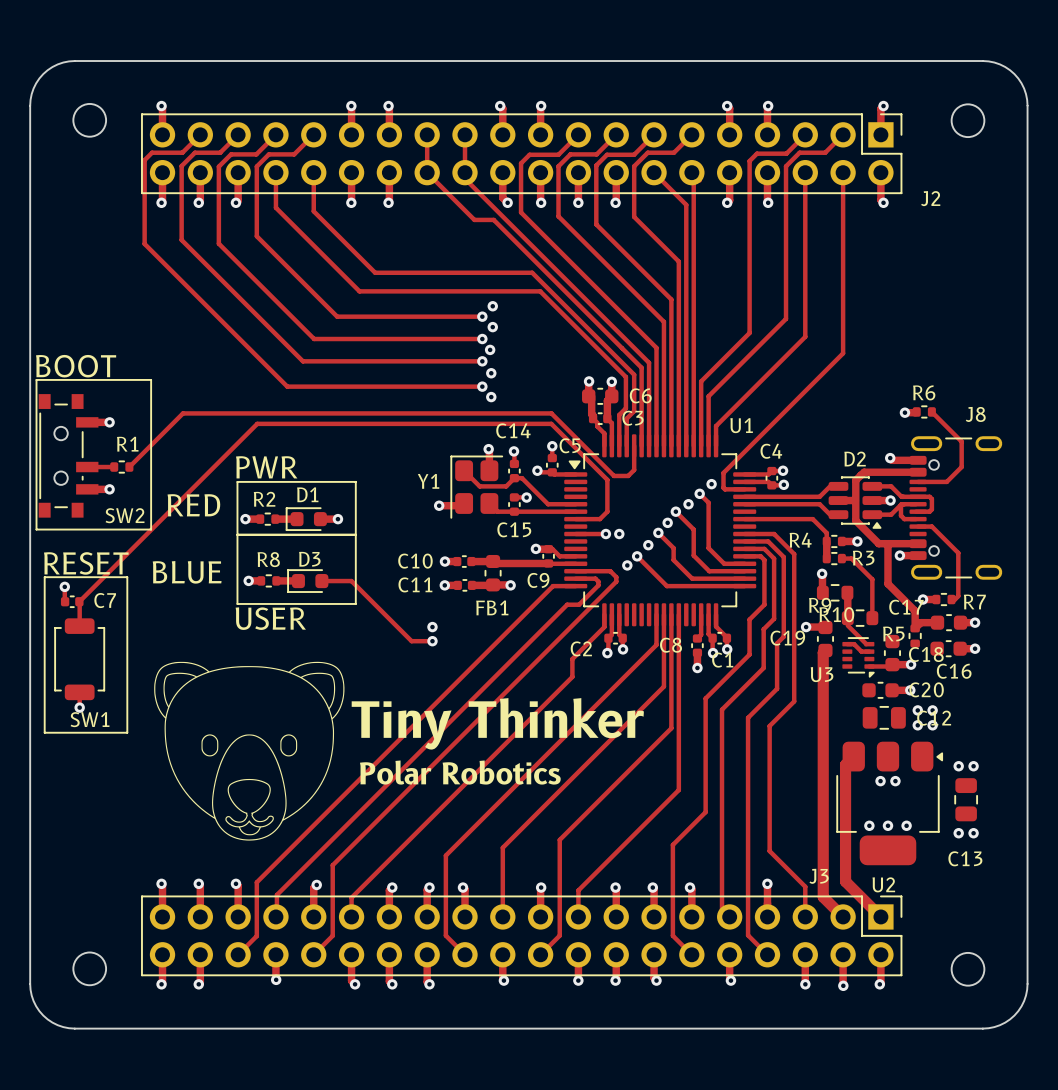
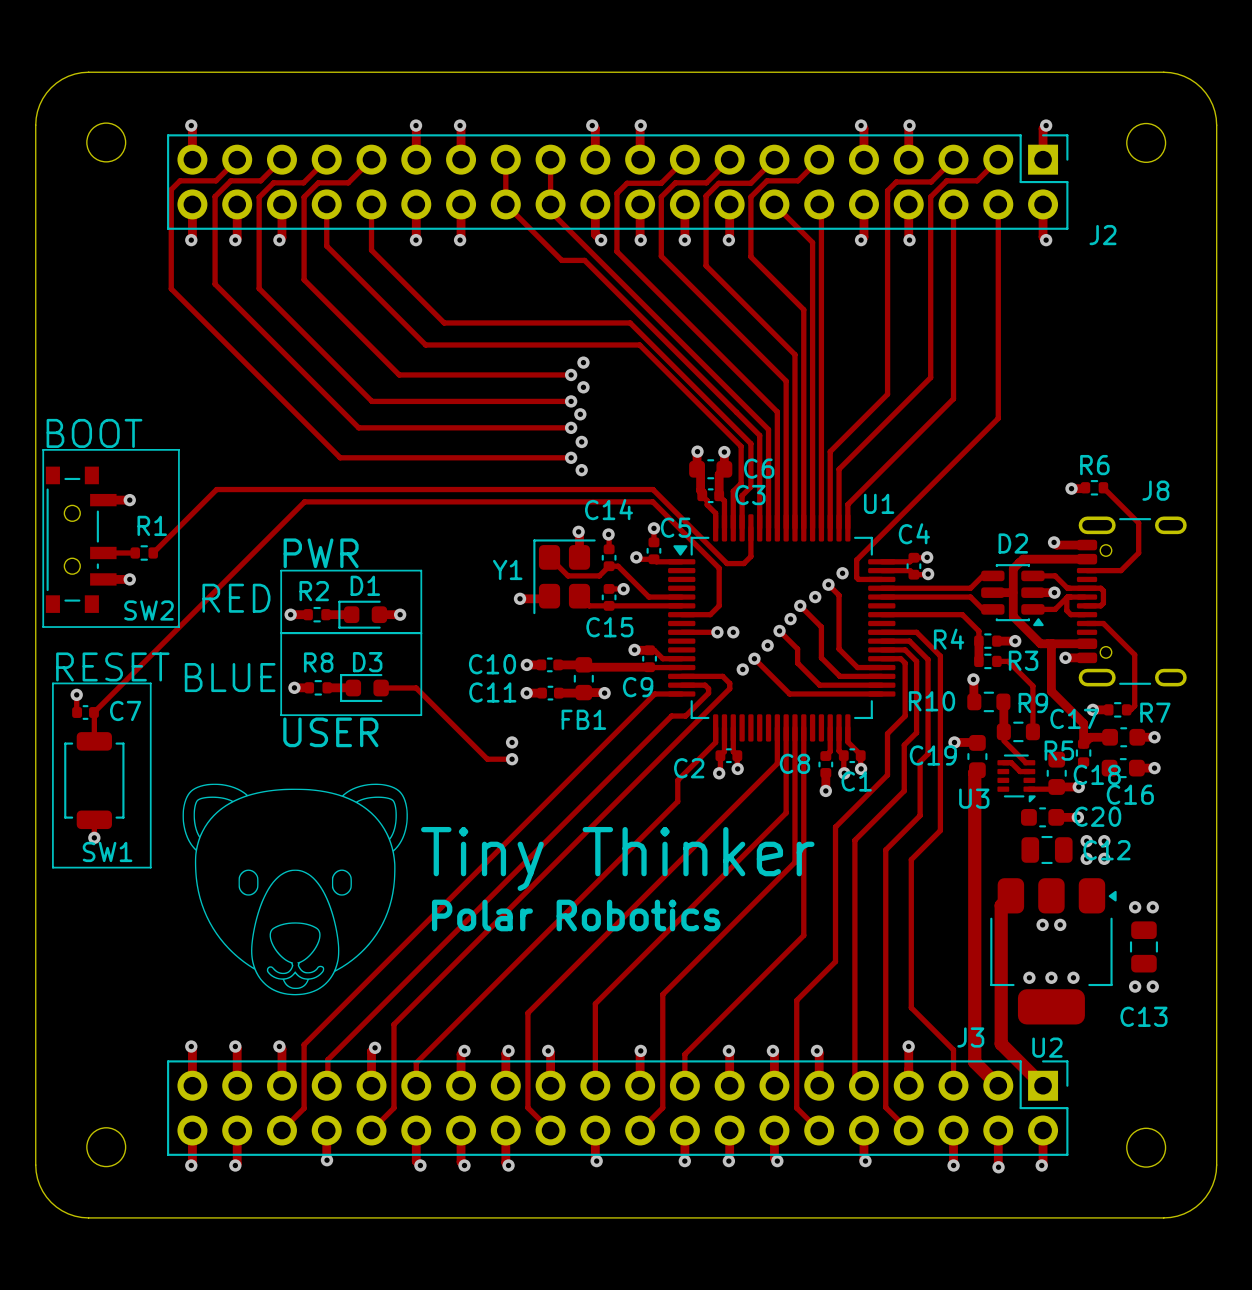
R9 name position: R9 (820, 605) -> R9 (1033, 703)
R10 name position: R10 (836, 614) -> R10 (931, 701)

